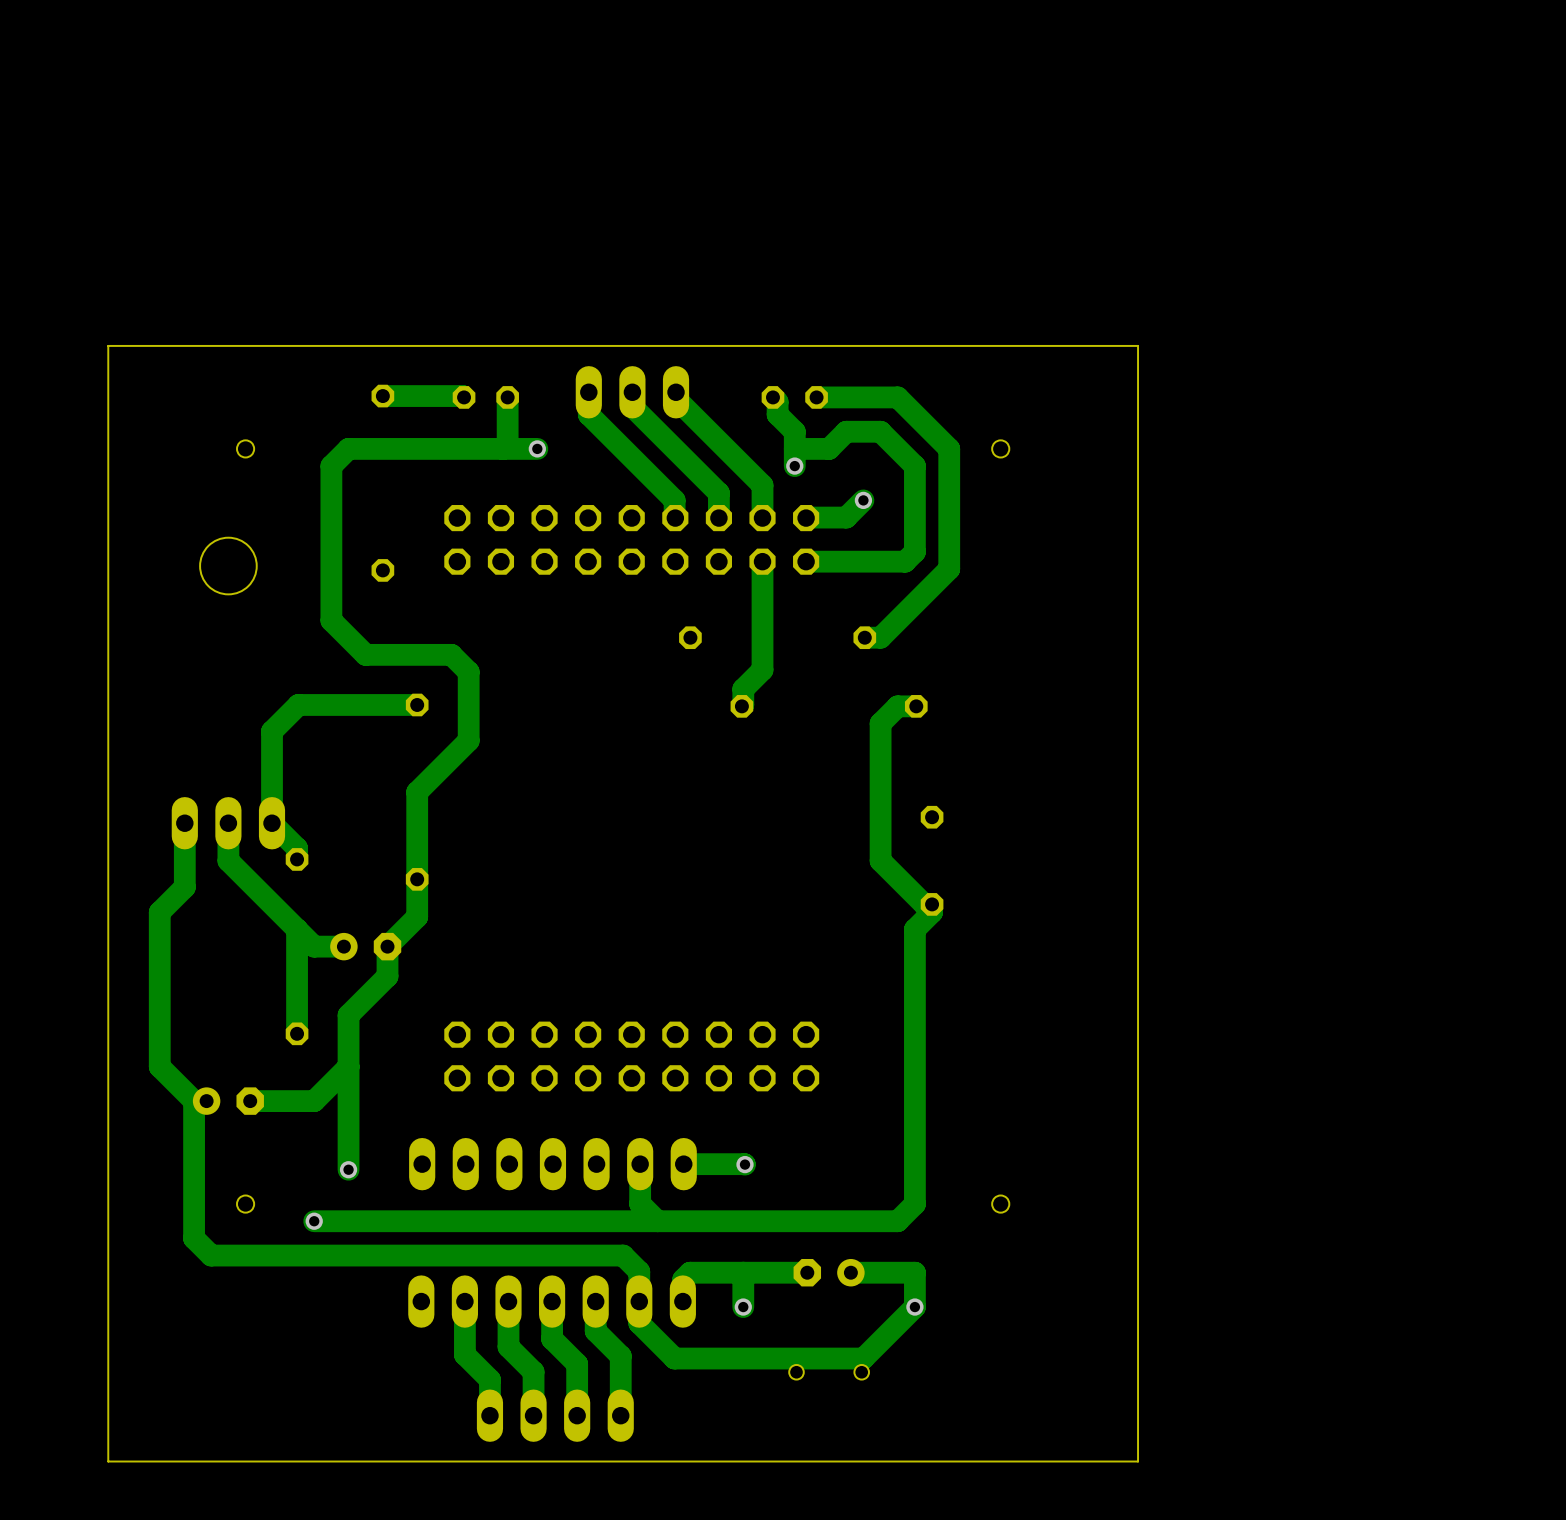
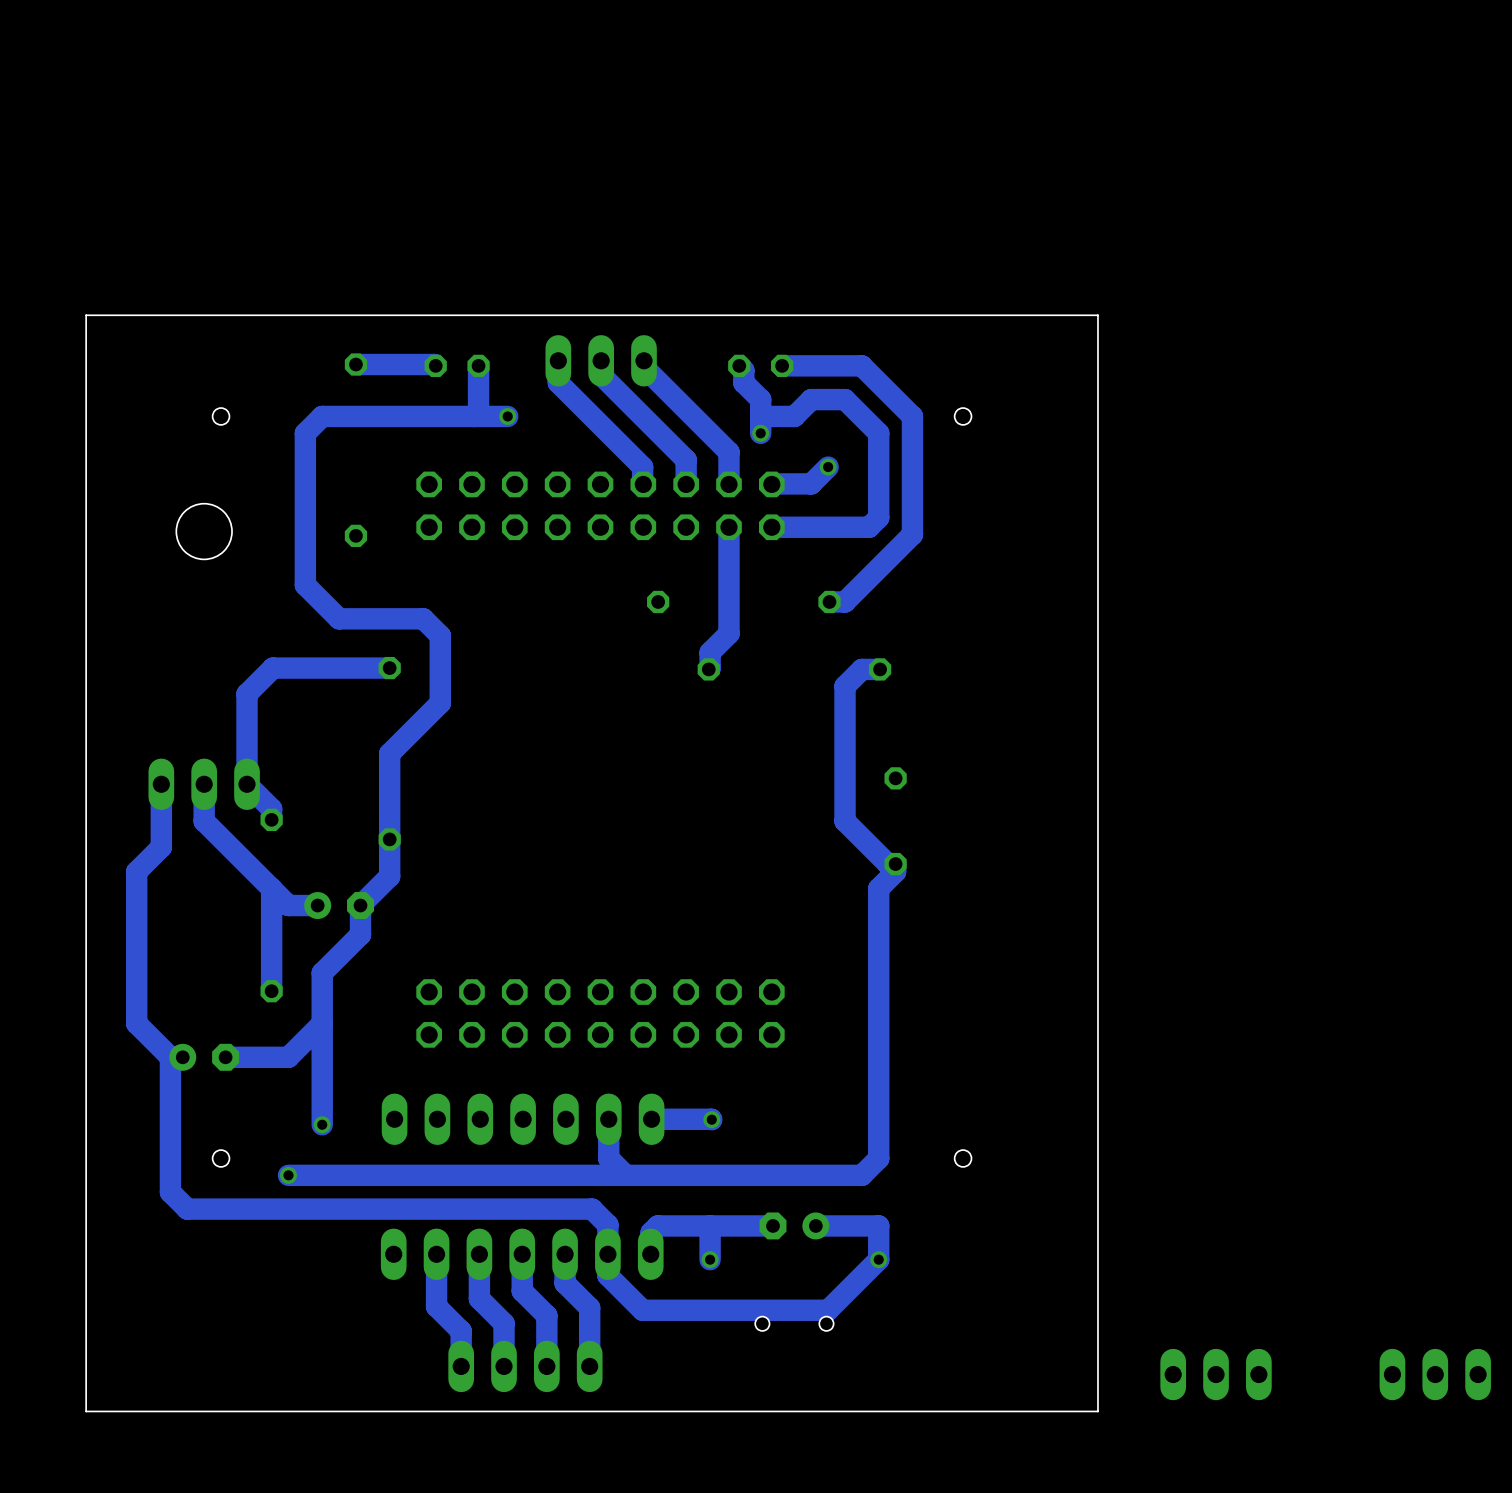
part: none -> (1216, 1374)
part: none -> (1435, 1374)

